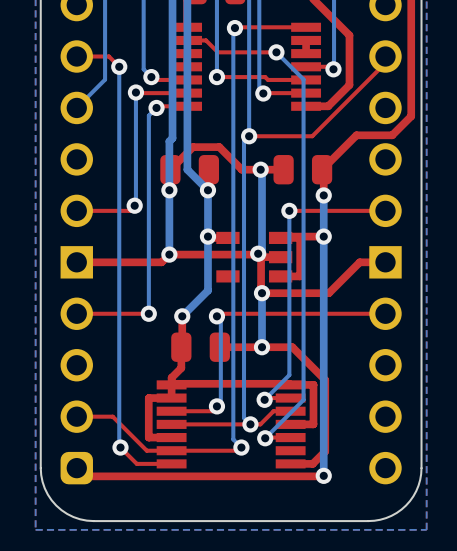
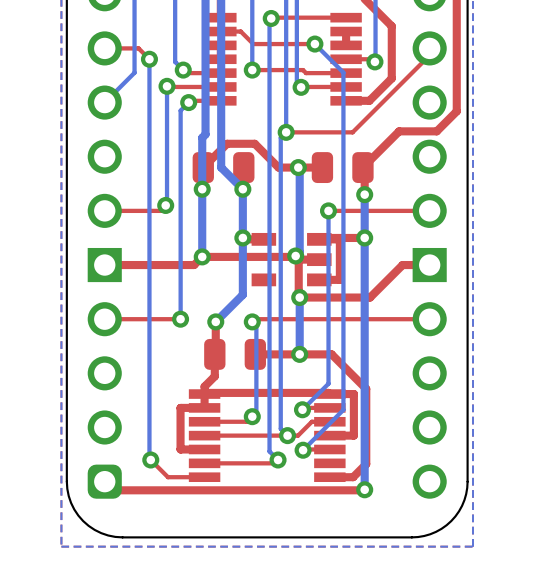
top track: (76, 416) (112, 416) (146, 450) (171, 450) -> none

